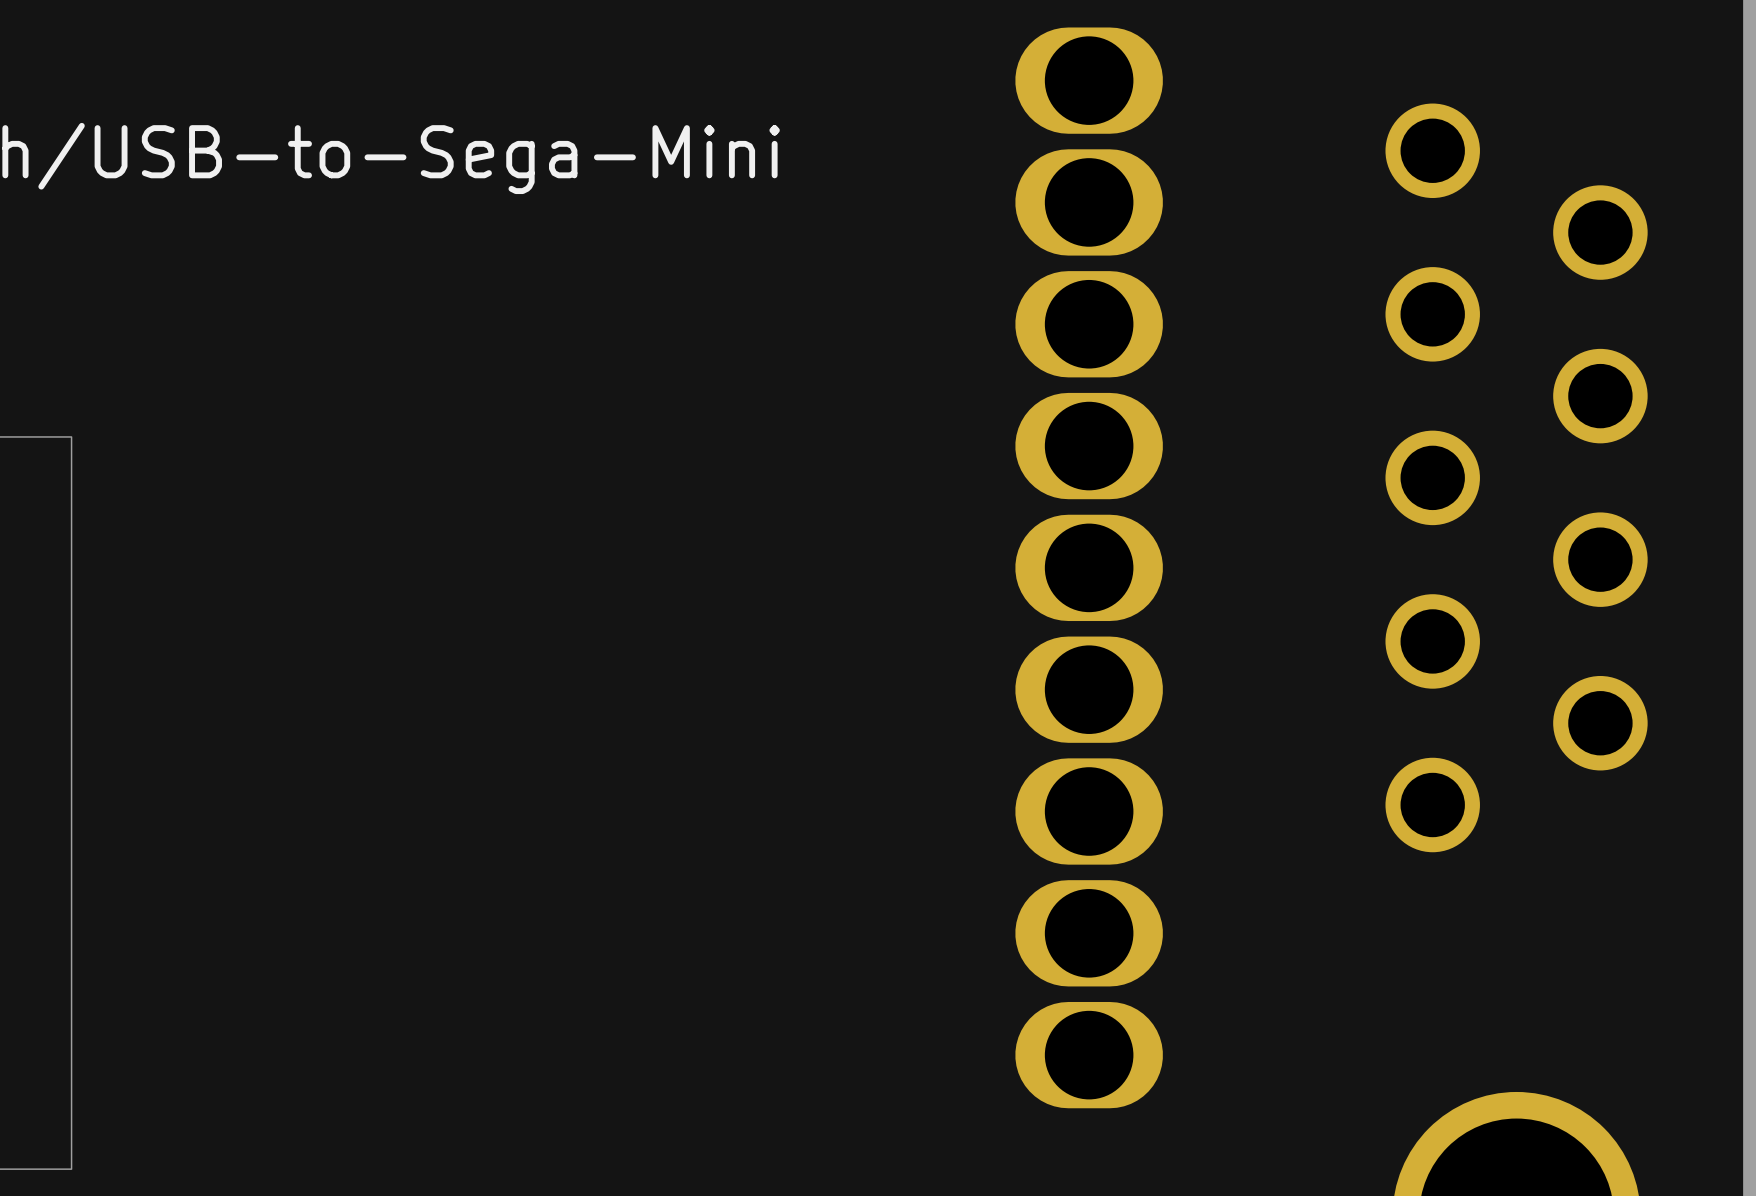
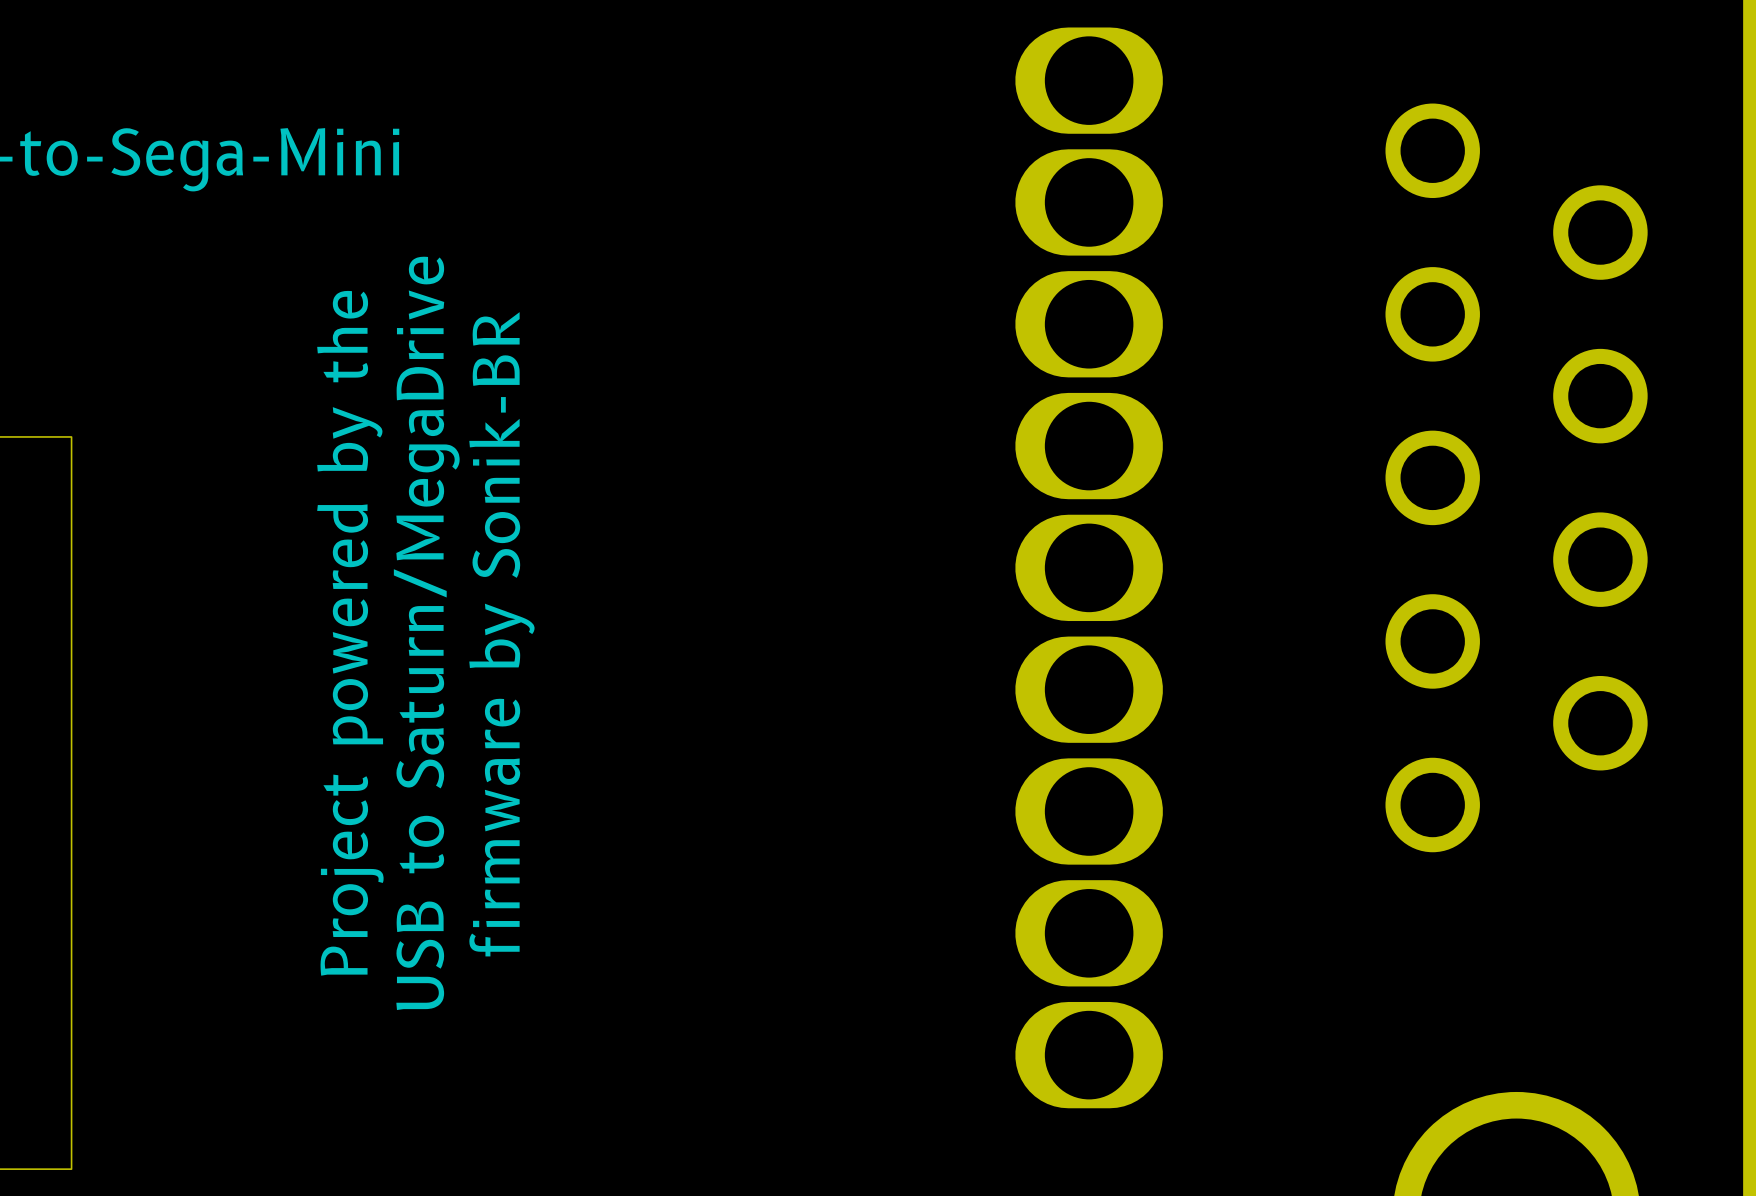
text: none -> Project powered by the (350, 633)
text: none -> USB to Saturn/MegaDrive (426, 633)
text: none -> firmware by Sonik-BR (501, 634)

